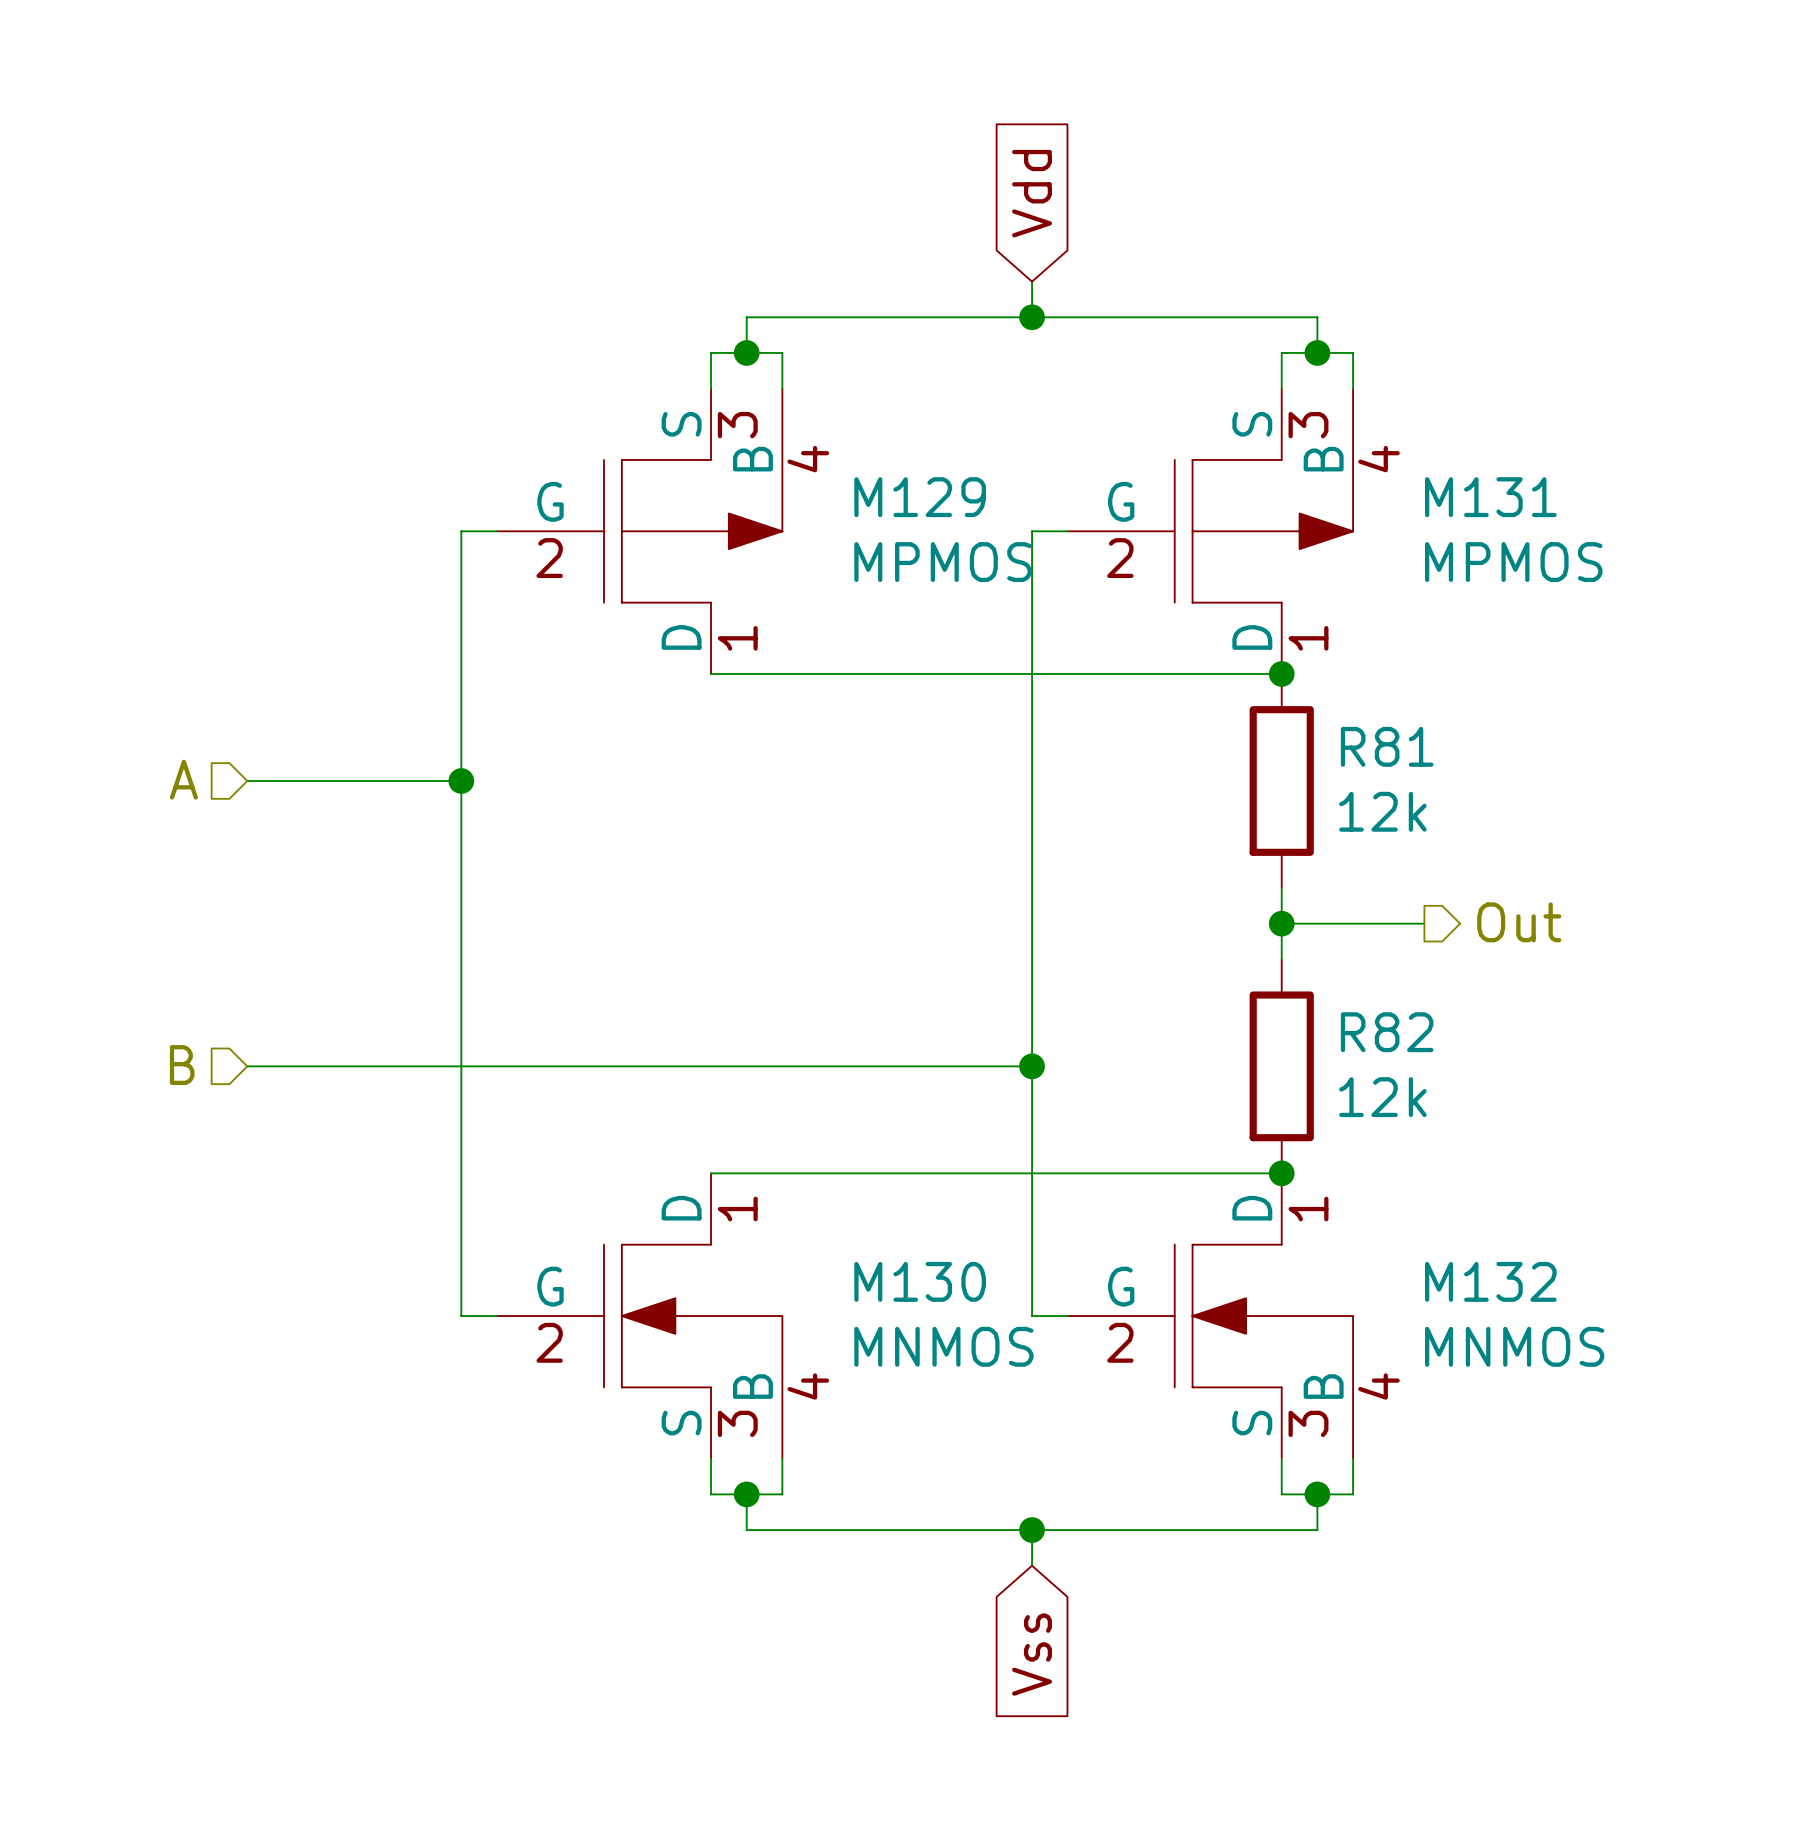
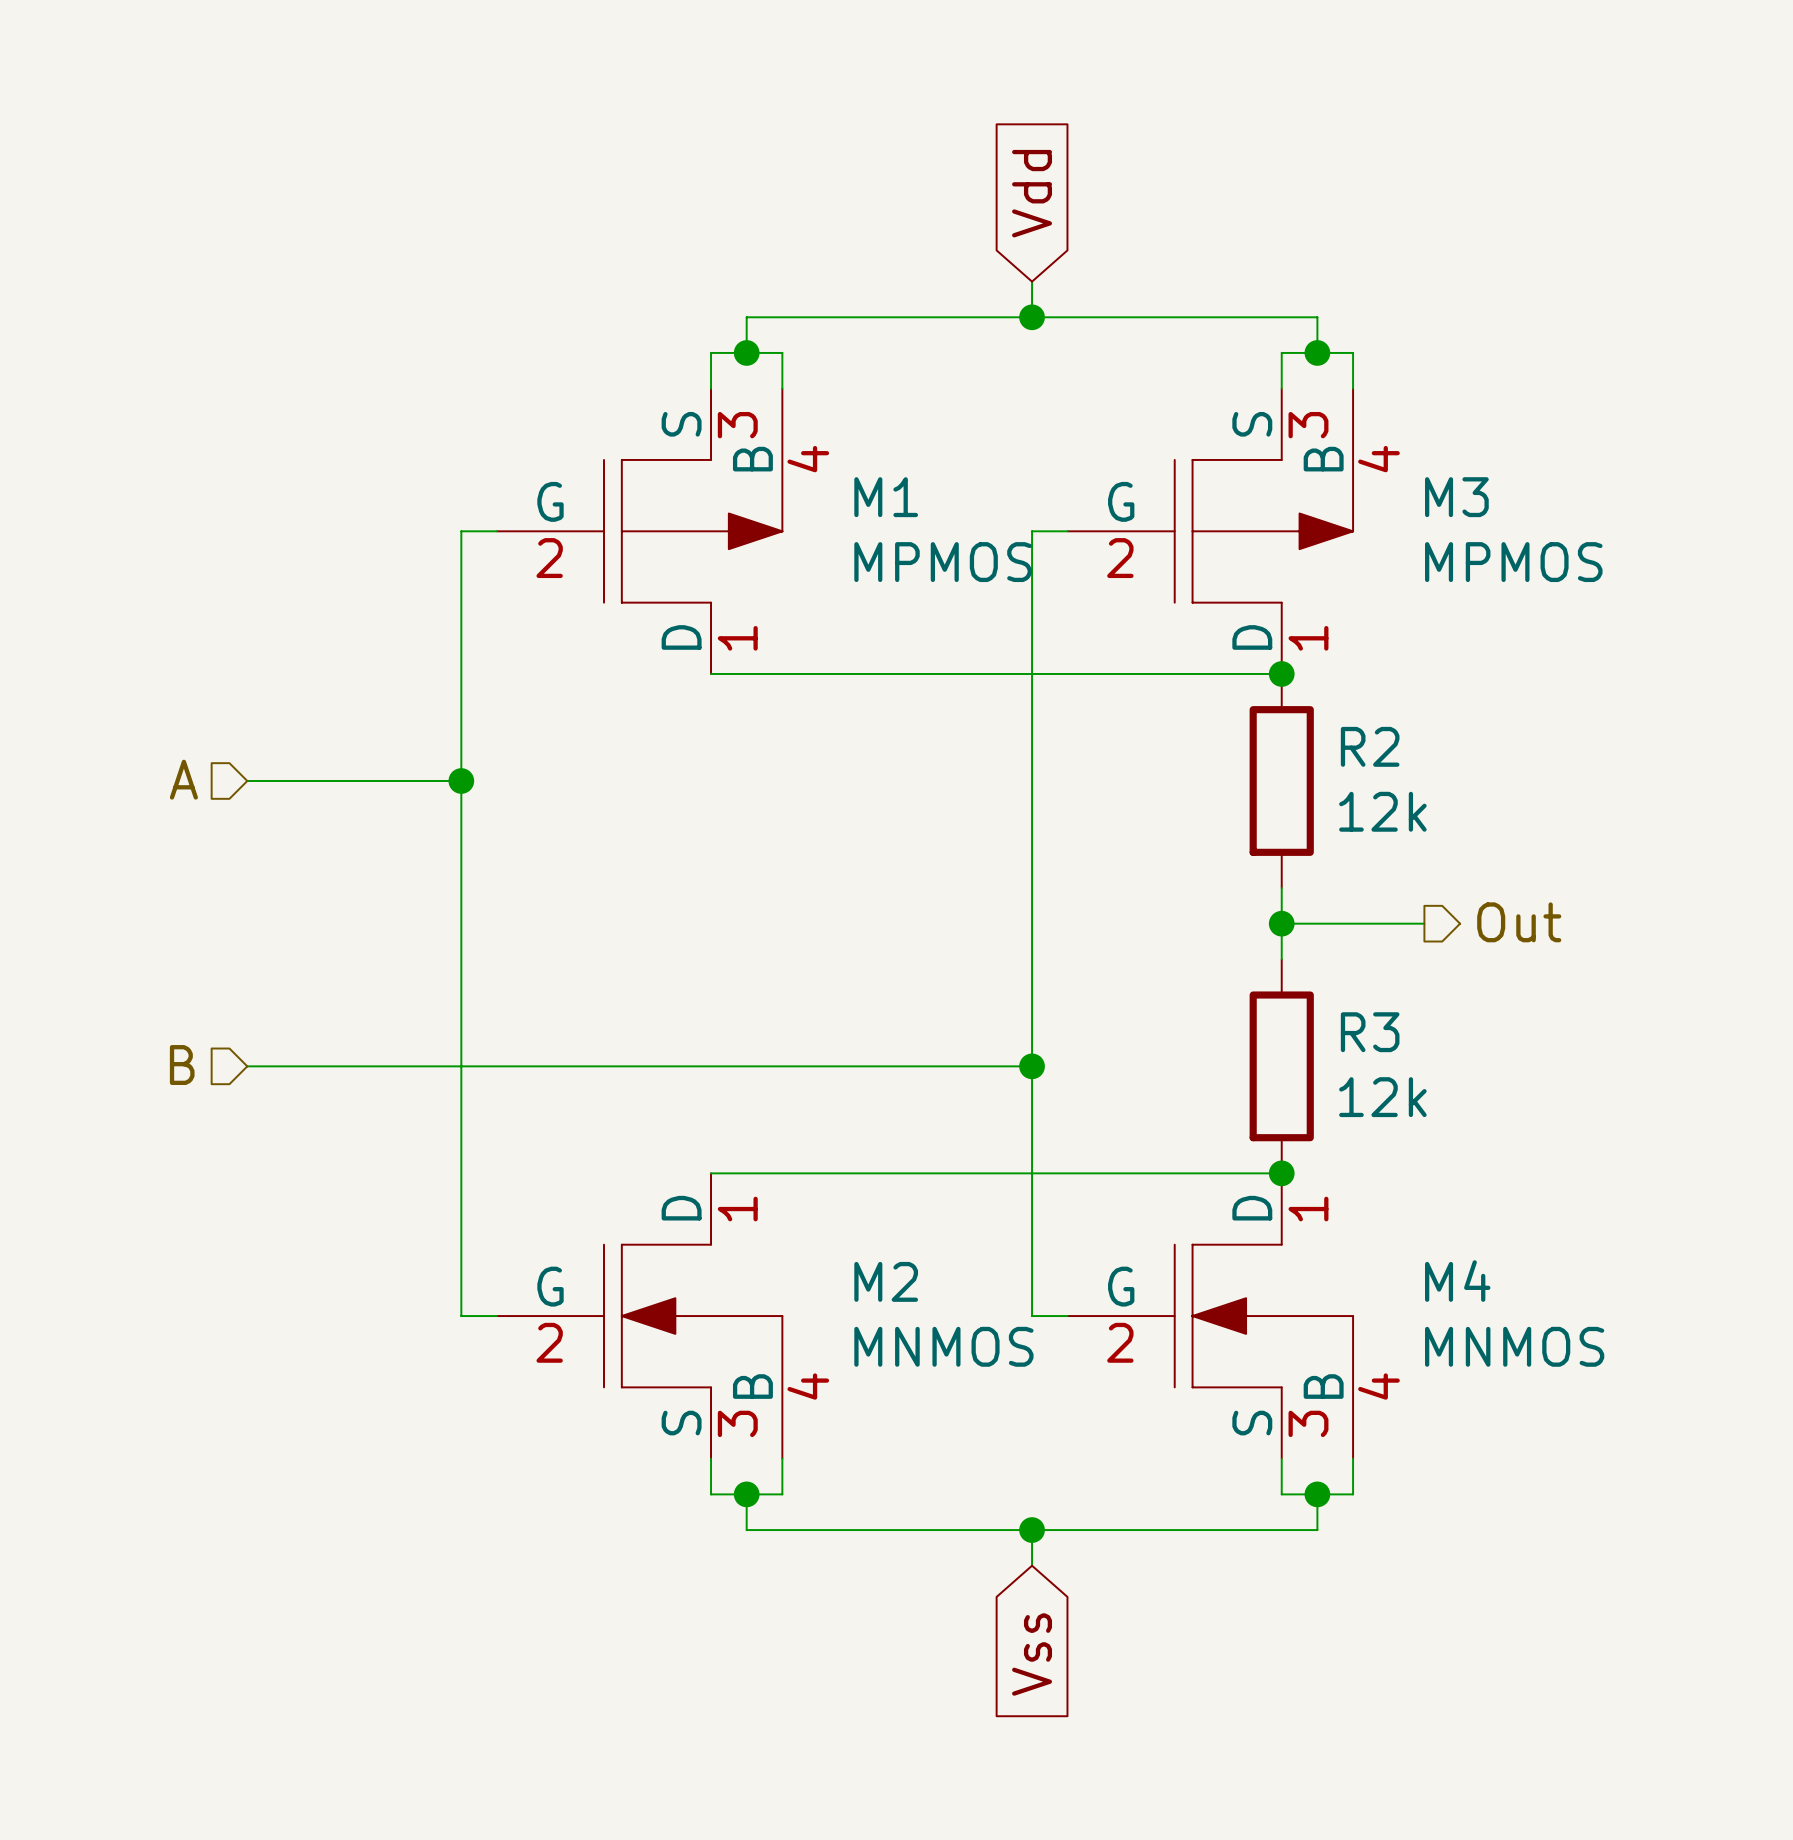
M129 name: M129 (920, 497) -> M1 (886, 497)
M131 name: M131 (1490, 497) -> M3 (1456, 497)
R81 name: R81 (1387, 746) -> R2 (1370, 746)
R82 name: R82 (1387, 1032) -> R3 (1370, 1032)
M130 name: M130 (920, 1281) -> M2 (886, 1281)
M132 name: M132 (1490, 1281) -> M4 (1457, 1281)

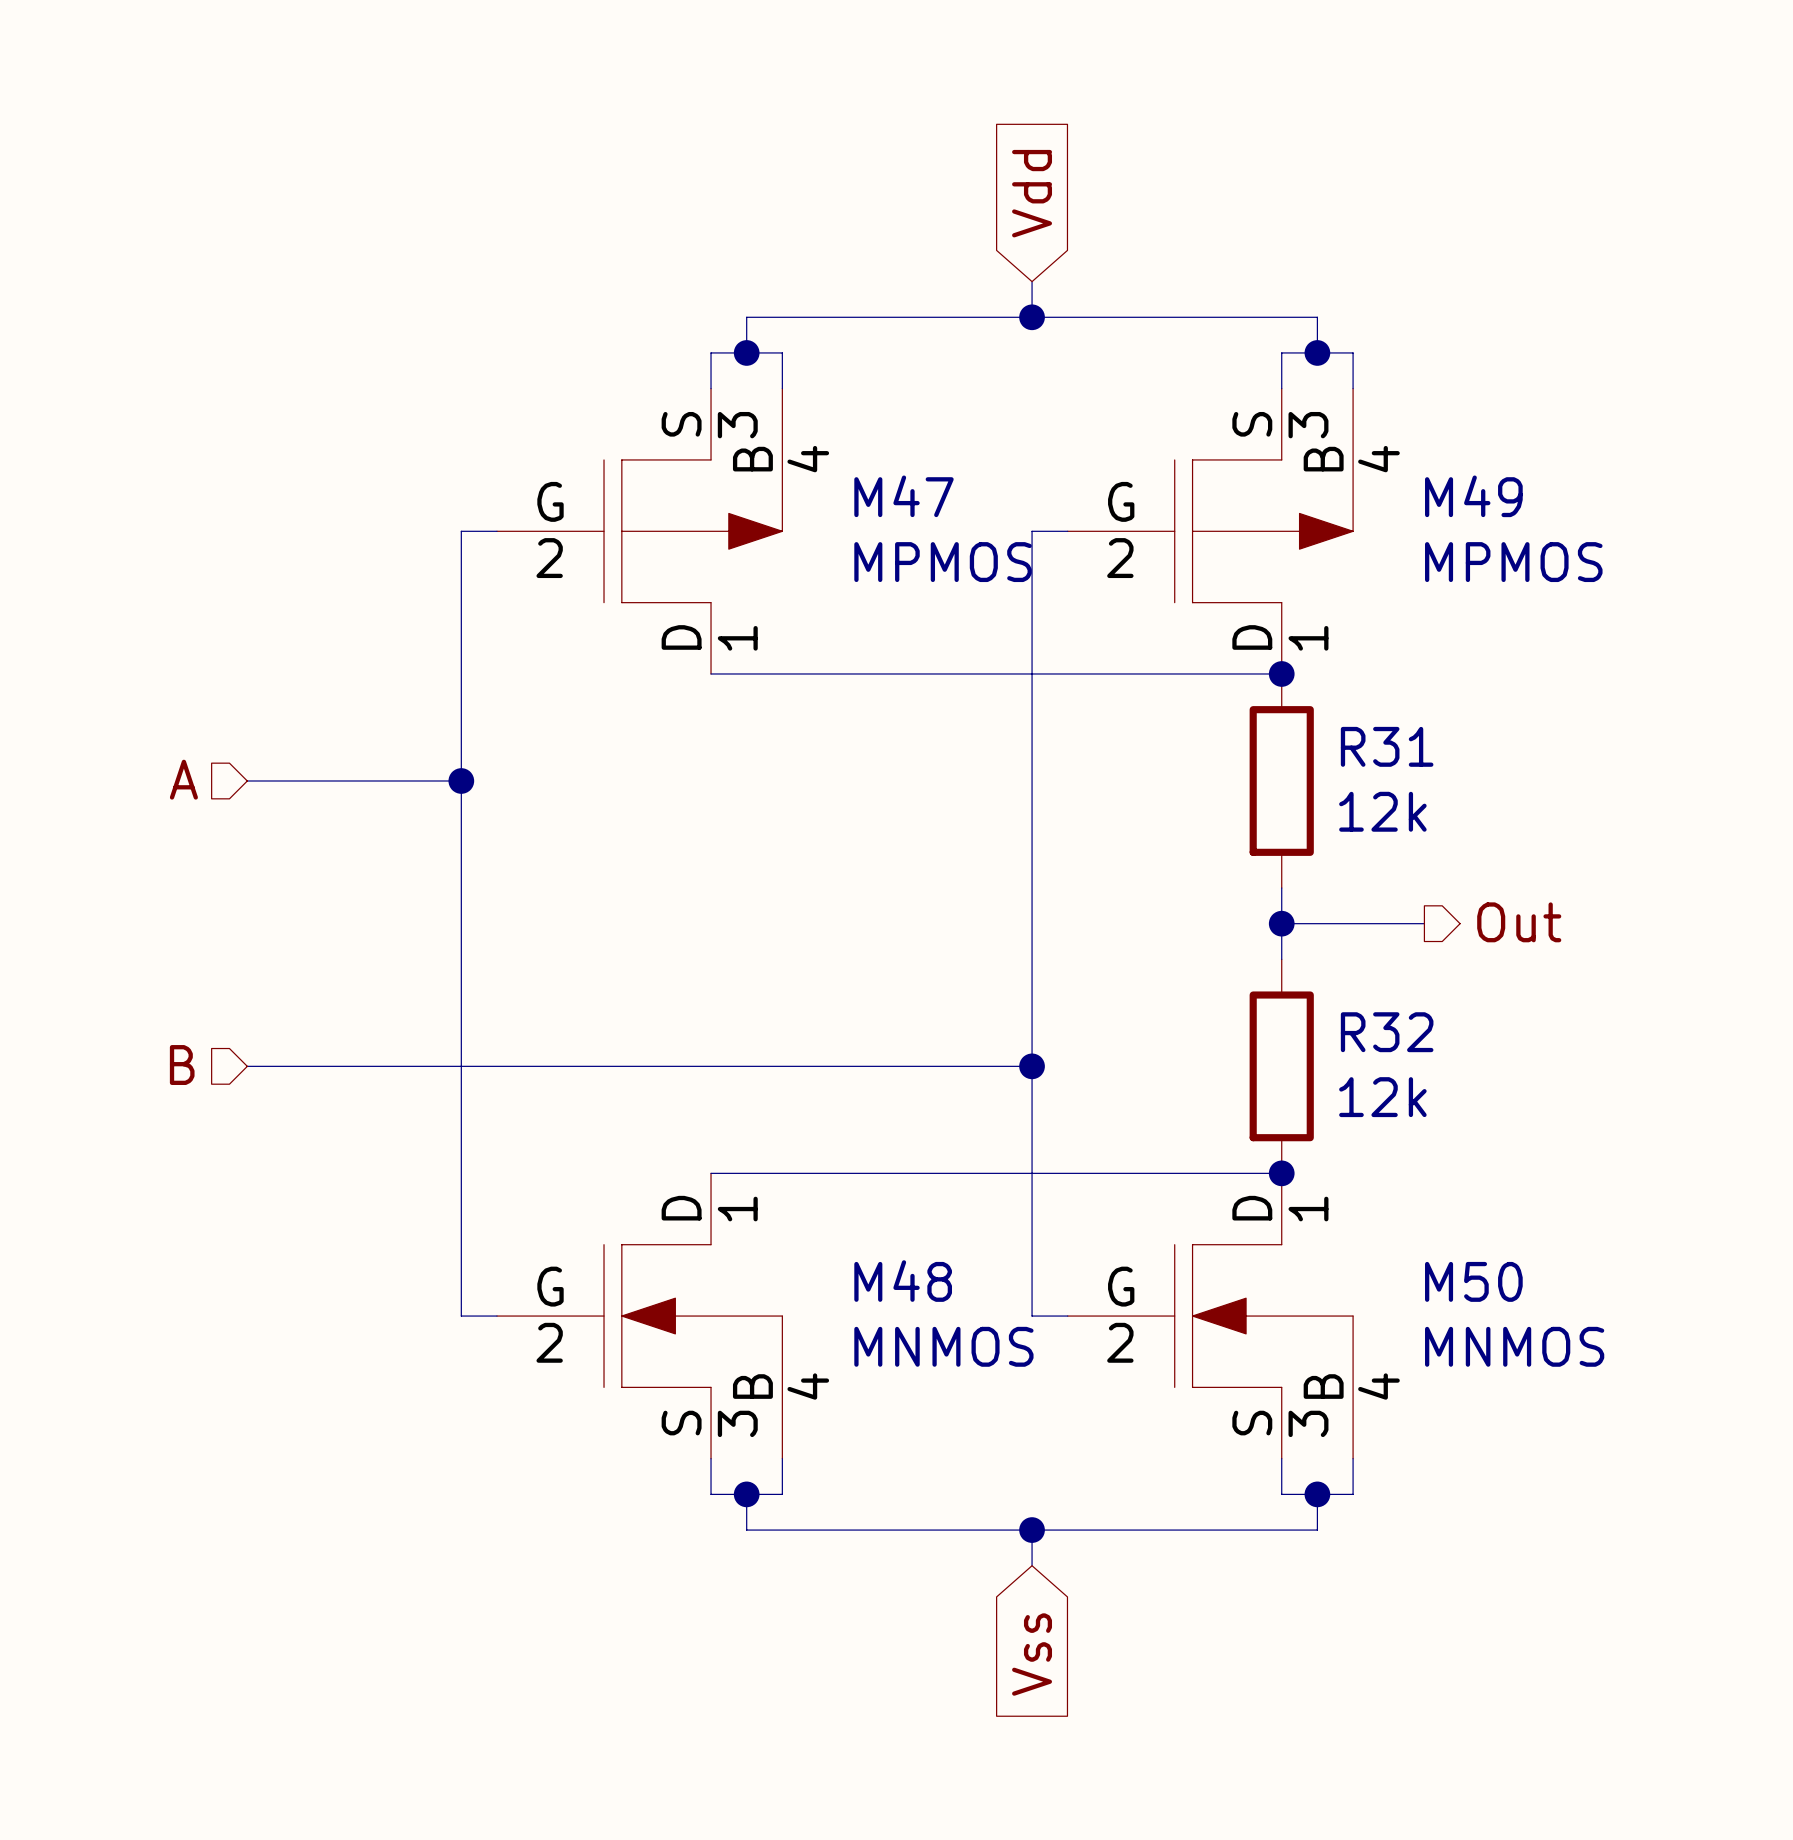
M1 name: M1 (886, 497) -> M47 (904, 496)
M3 name: M3 (1456, 497) -> M49 (1473, 496)
R2 name: R2 (1370, 746) -> R31 (1387, 746)
R3 name: R3 (1370, 1032) -> R32 (1387, 1032)
M2 name: M2 (886, 1281) -> M48 (903, 1281)
M4 name: M4 (1457, 1281) -> M50 (1473, 1281)

